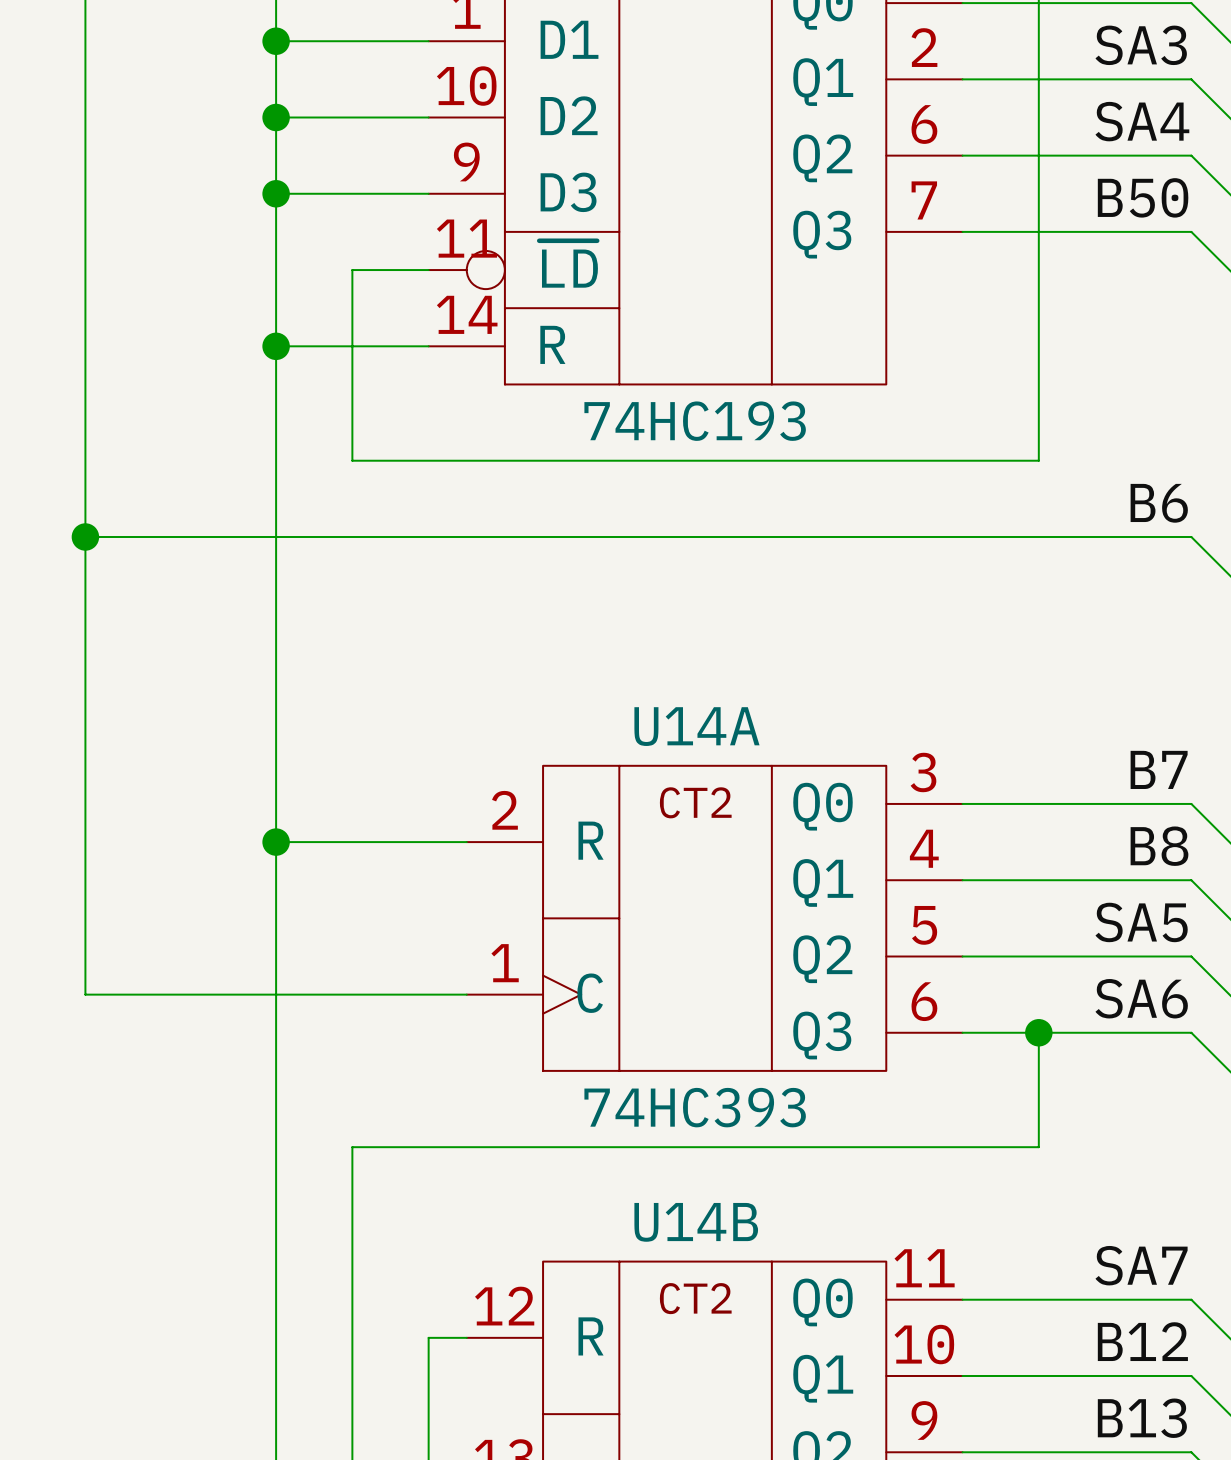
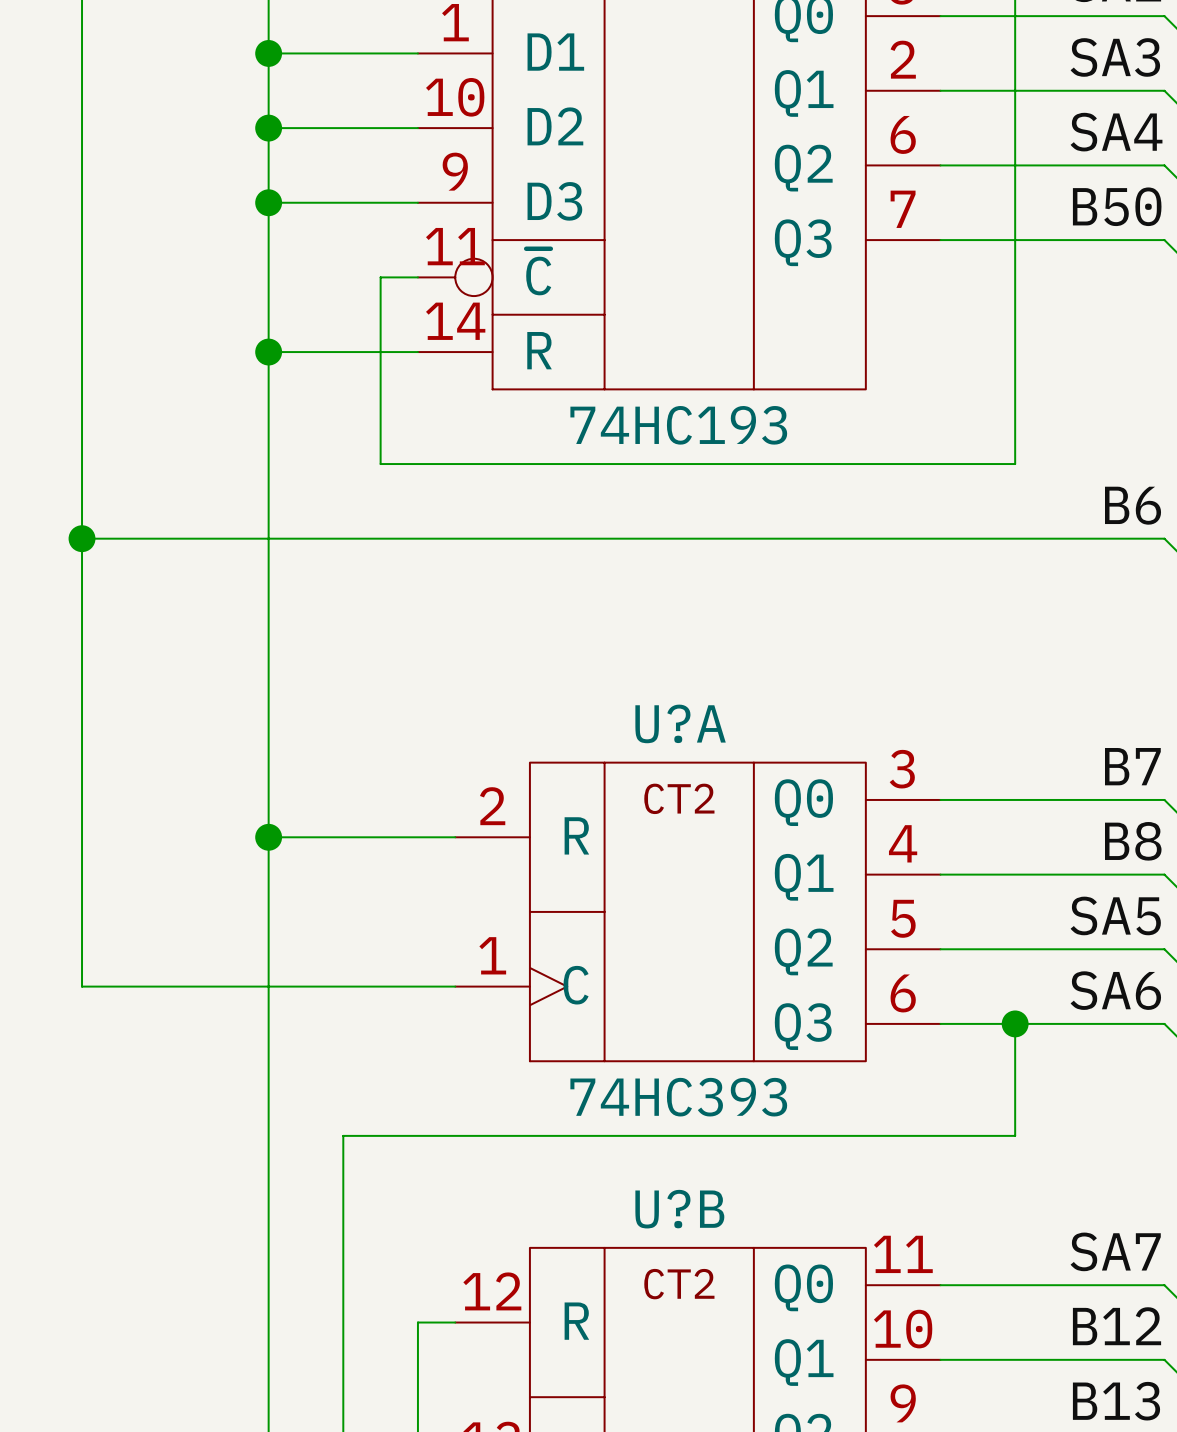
part pin name: ~{LD} (568, 264) -> ~{C} (538, 272)
wire: (390, 270) (352, 270) (352, 460) (390, 460) -> (380, 277) (380, 464)
U14A name: U14A (696, 726) -> U?A (680, 723)
U14B name: U14B (696, 1222) -> U?B (679, 1209)

